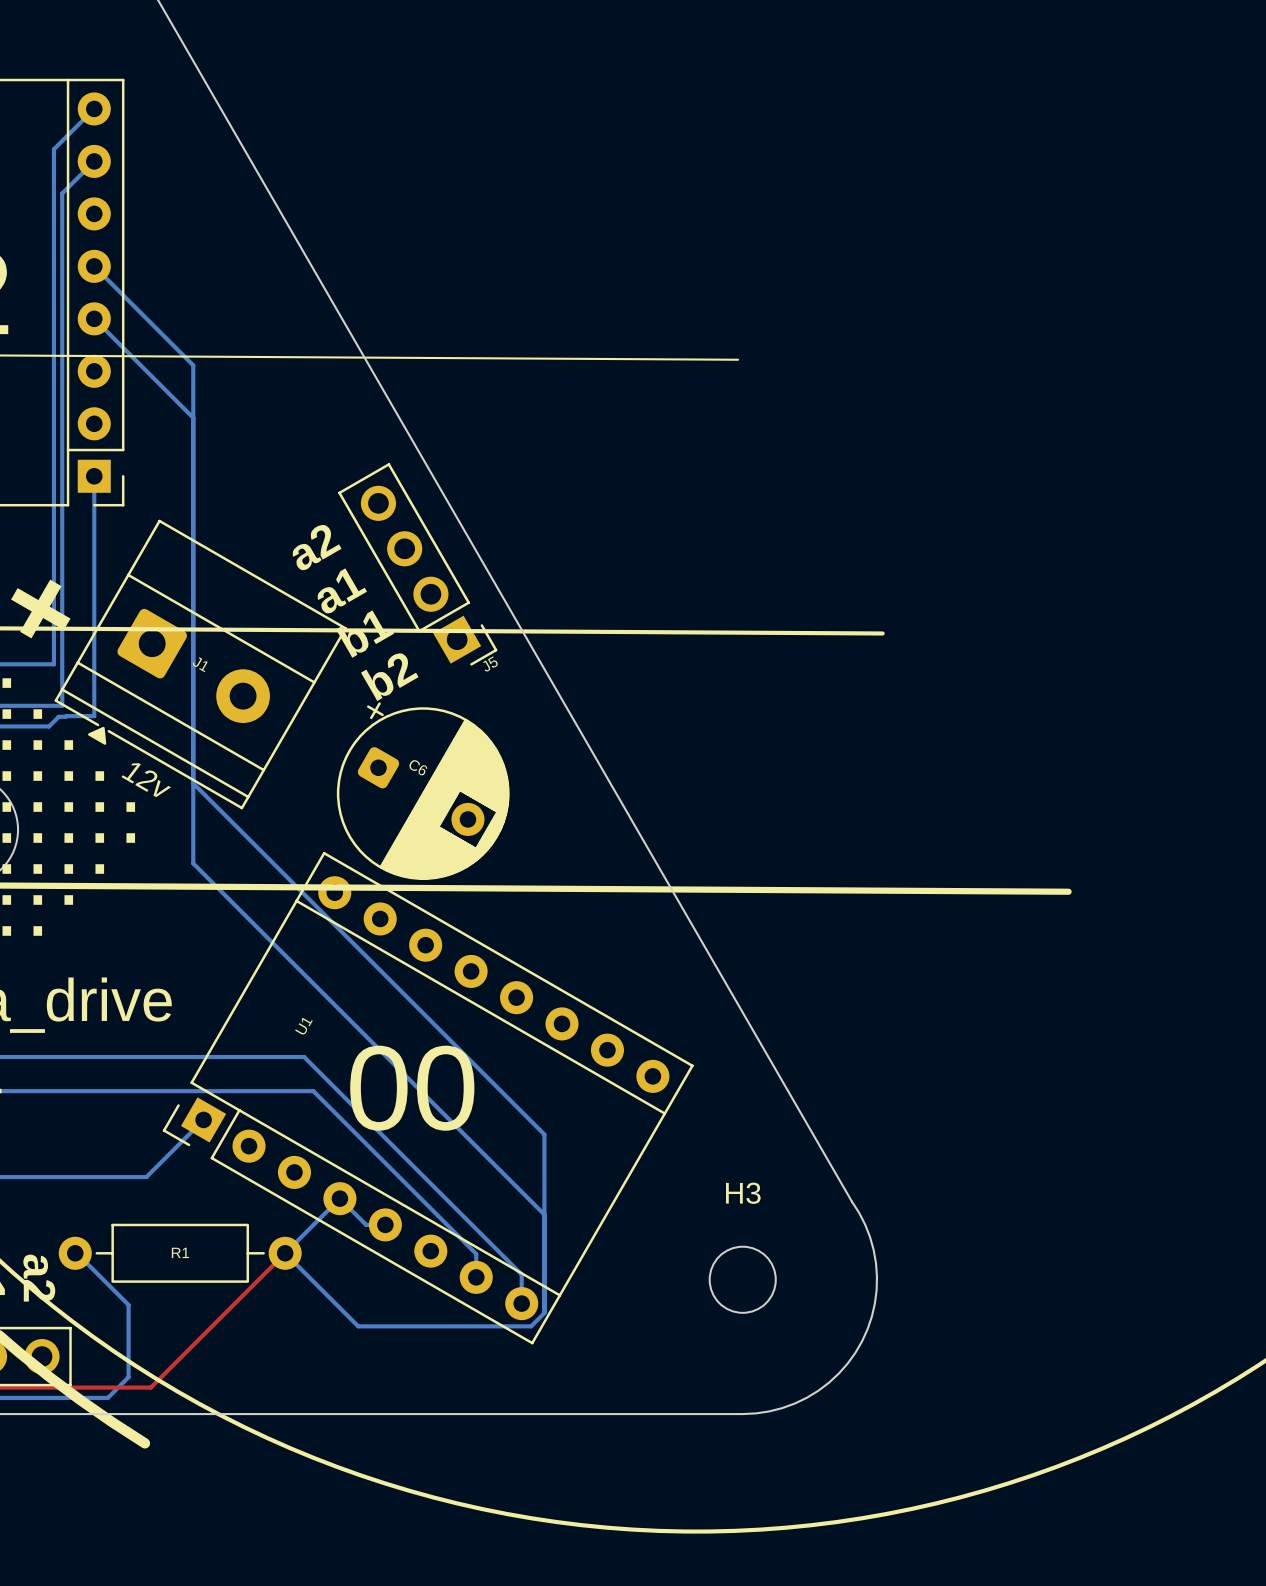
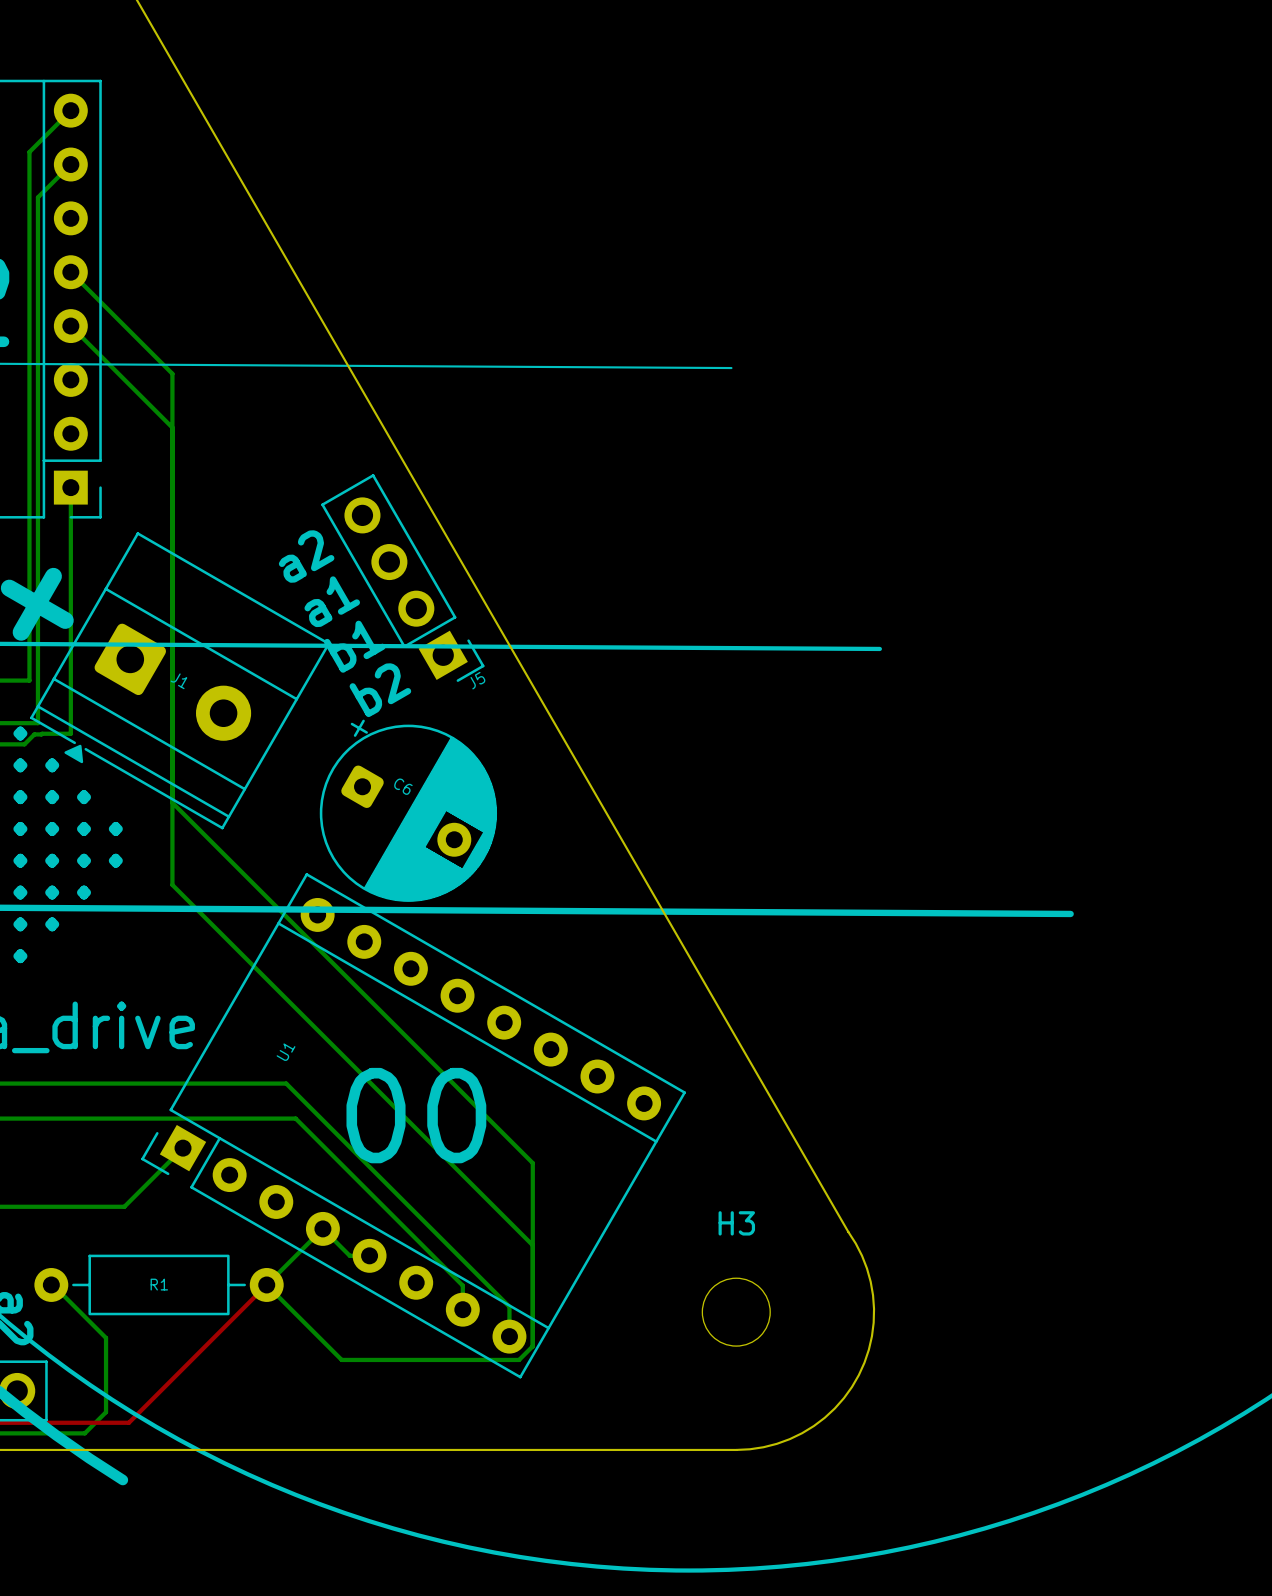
text: 12v (146, 780) -> none

